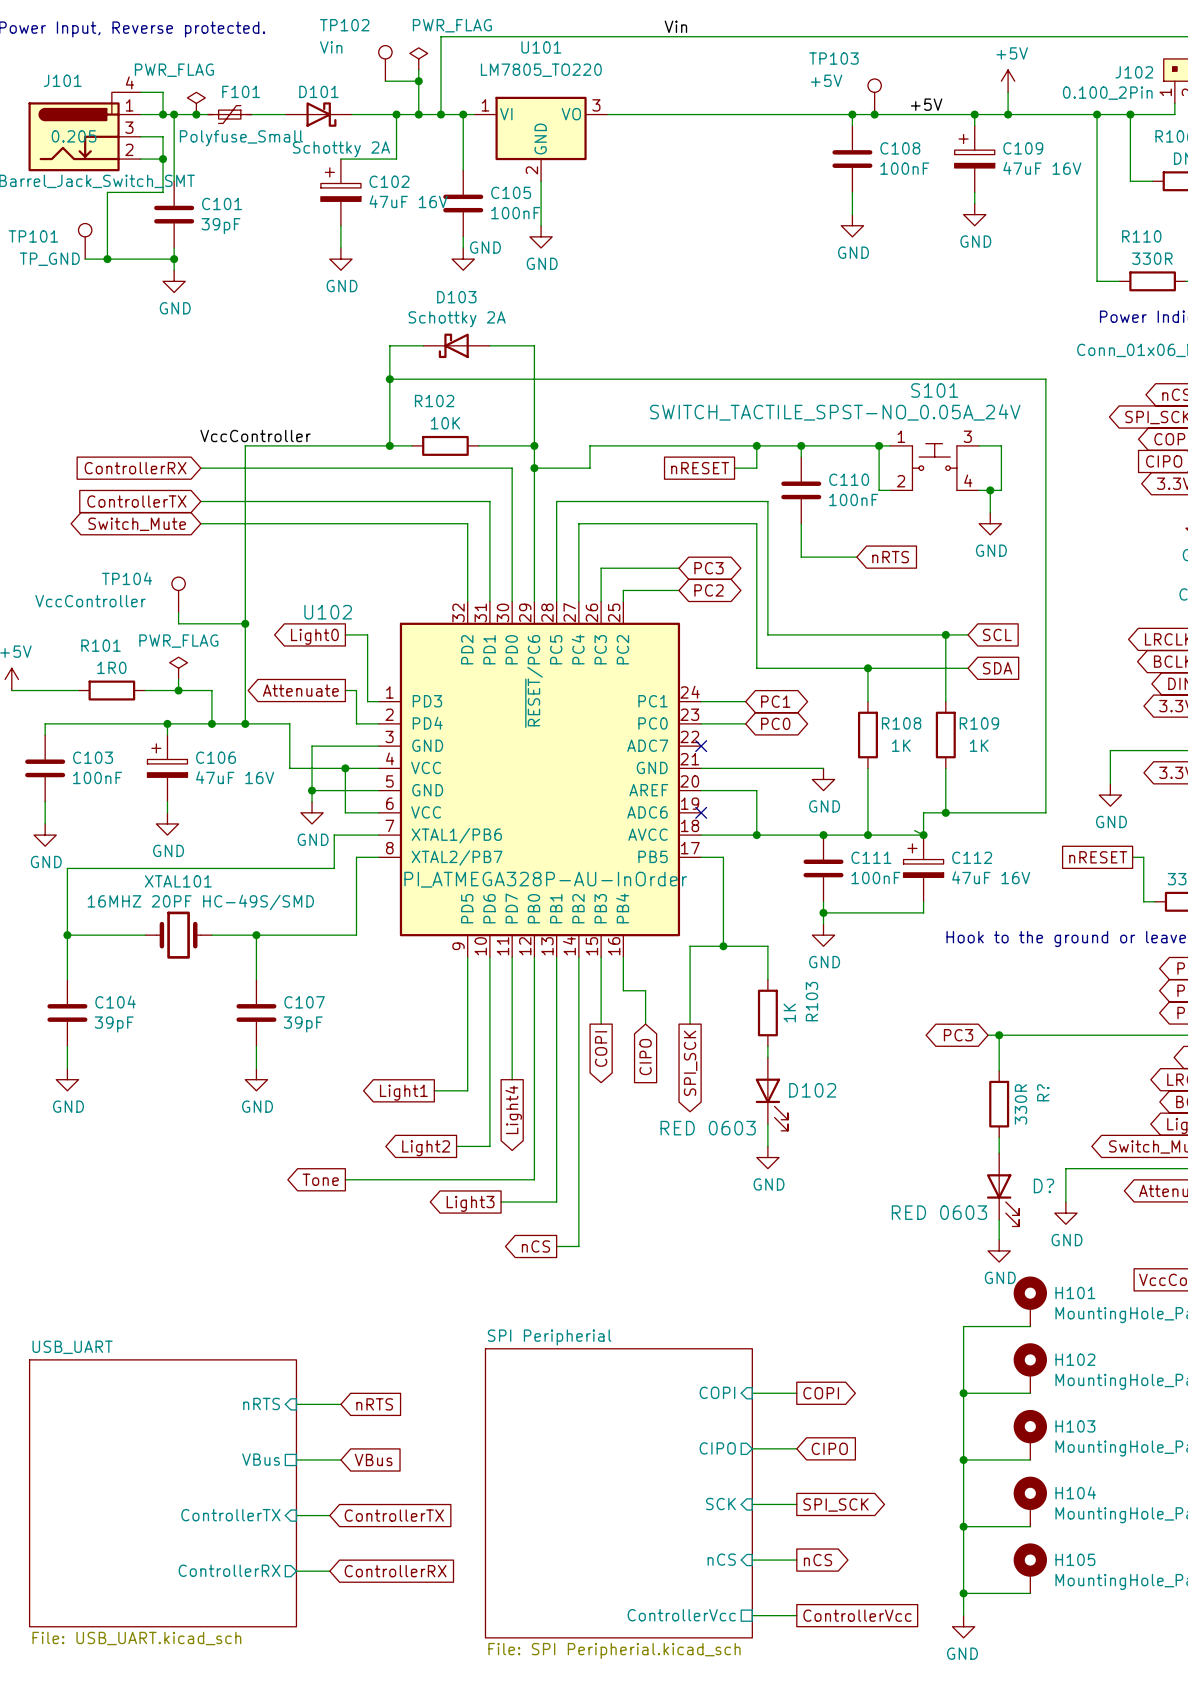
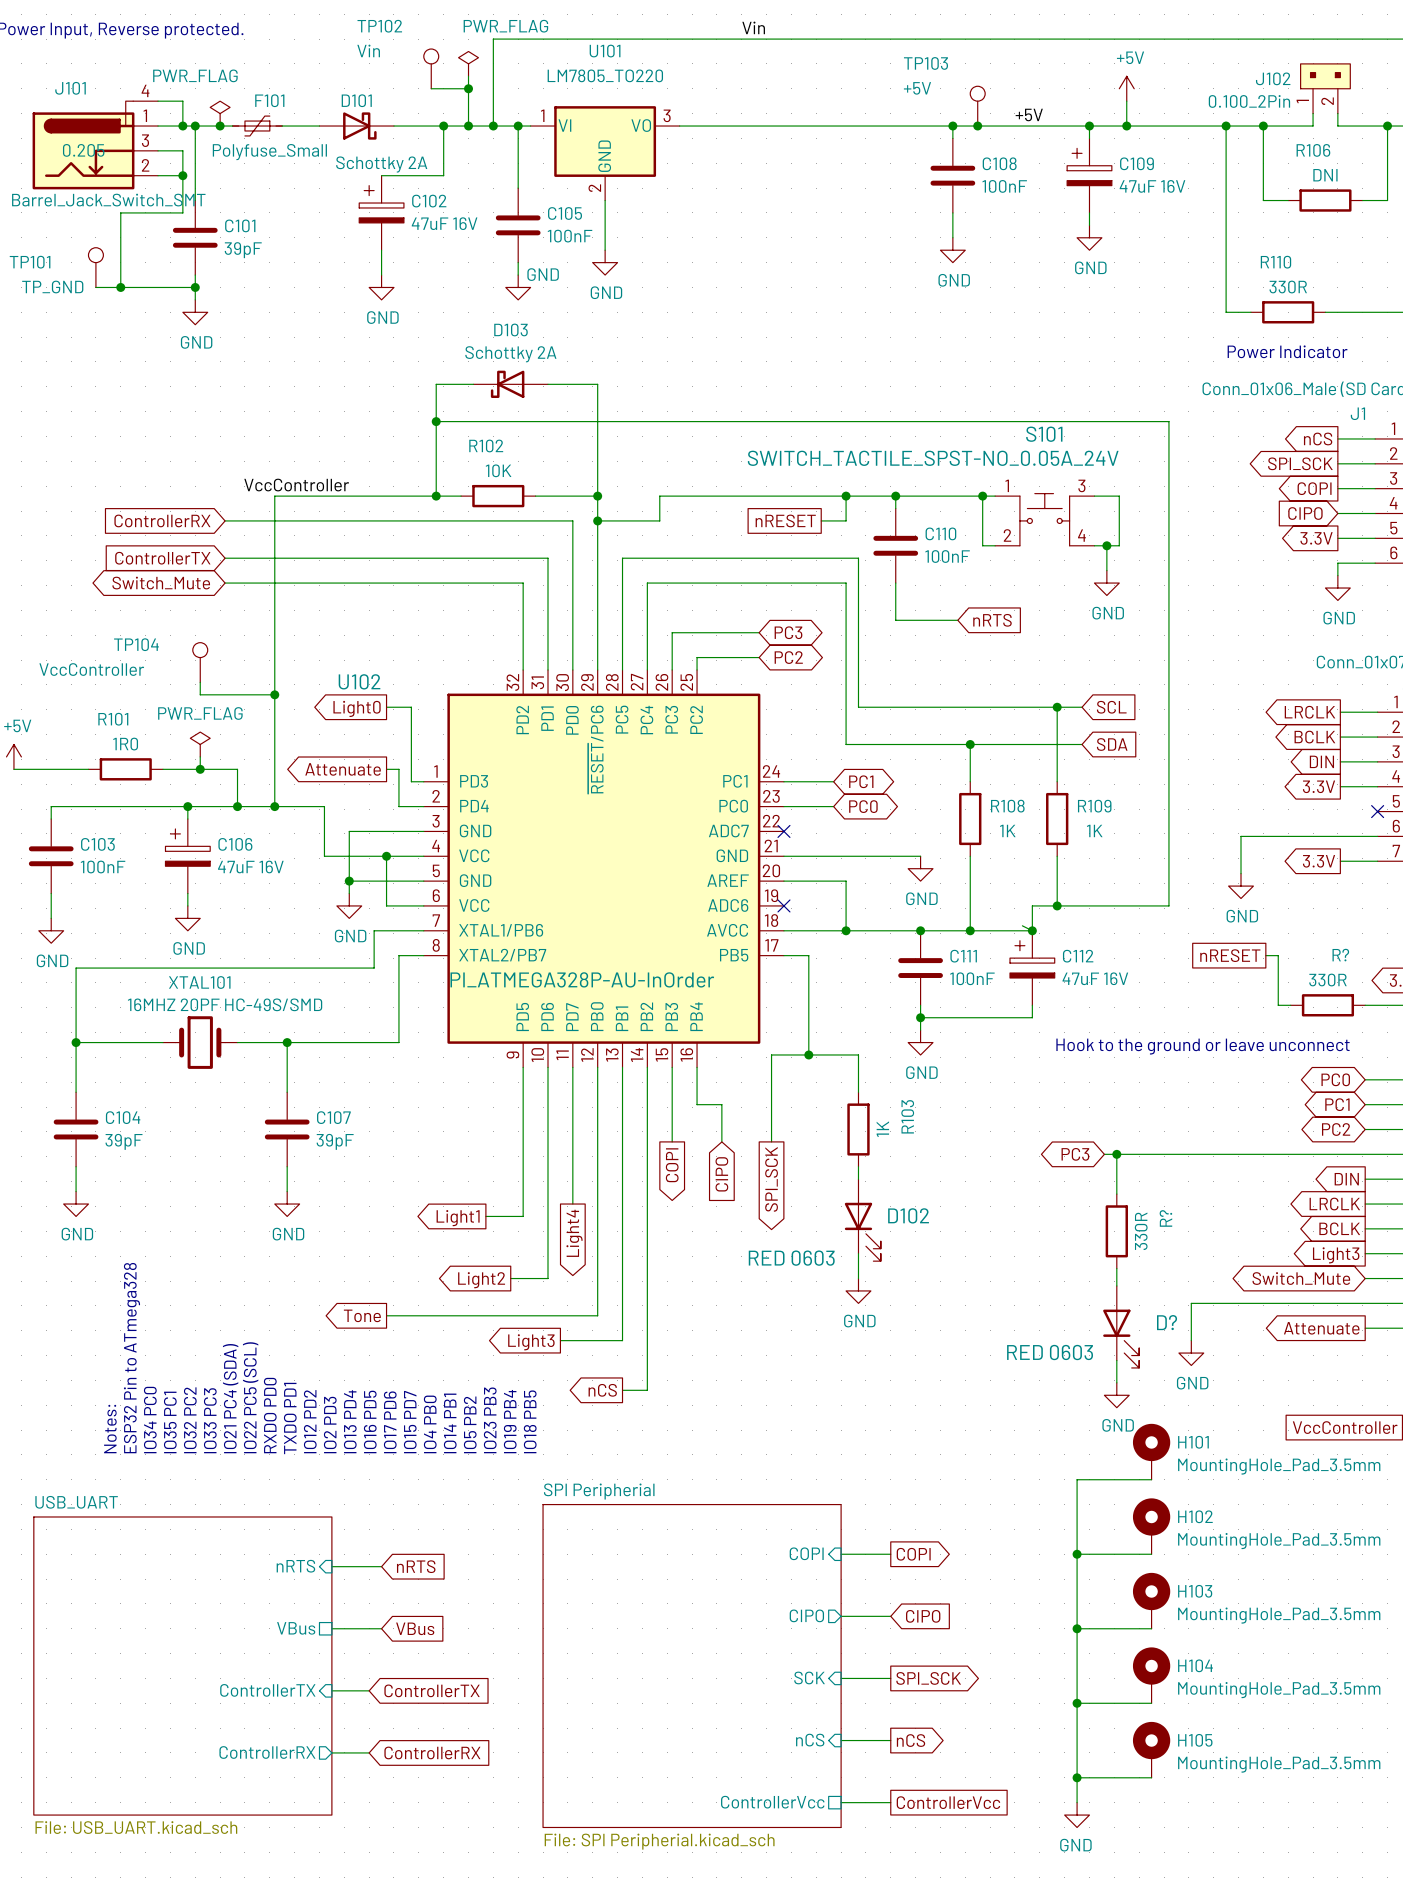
text: none -> ESP32 Pin to ATmega328 (131, 1358)
text: none -> IO21 PC4 (SDA) (230, 1398)
text: none -> IO22 PC5 (SCL) (250, 1397)
text: none -> RXDO PD0 (270, 1415)
text: none -> TXDO PD1 (290, 1418)
text: none -> IO34 PC0 (150, 1420)
text: none -> IO35 PC1 (170, 1422)
text: none -> IO32 PC2 (190, 1420)
text: none -> IO33 PC3 (210, 1420)
text: none -> IO12 PD2 (310, 1421)
text: none -> IO13 PD4 (350, 1421)
text: none -> IO16 PD5 (370, 1421)
text: none -> IO17 PD6 (390, 1422)
text: none -> IO15 PD7 (410, 1422)
text: none -> IO14 PB1 (450, 1423)
text: none -> IO23 PB3 (490, 1420)
text: none -> IO19 PB4 (510, 1421)
text: none -> IO18 PB5 (530, 1421)
text: none -> IO2 PD3 (330, 1425)
text: none -> IO4 PB0 (430, 1424)
text: none -> IO5 PB2 (470, 1424)
text: none -> Notes: (110, 1429)

